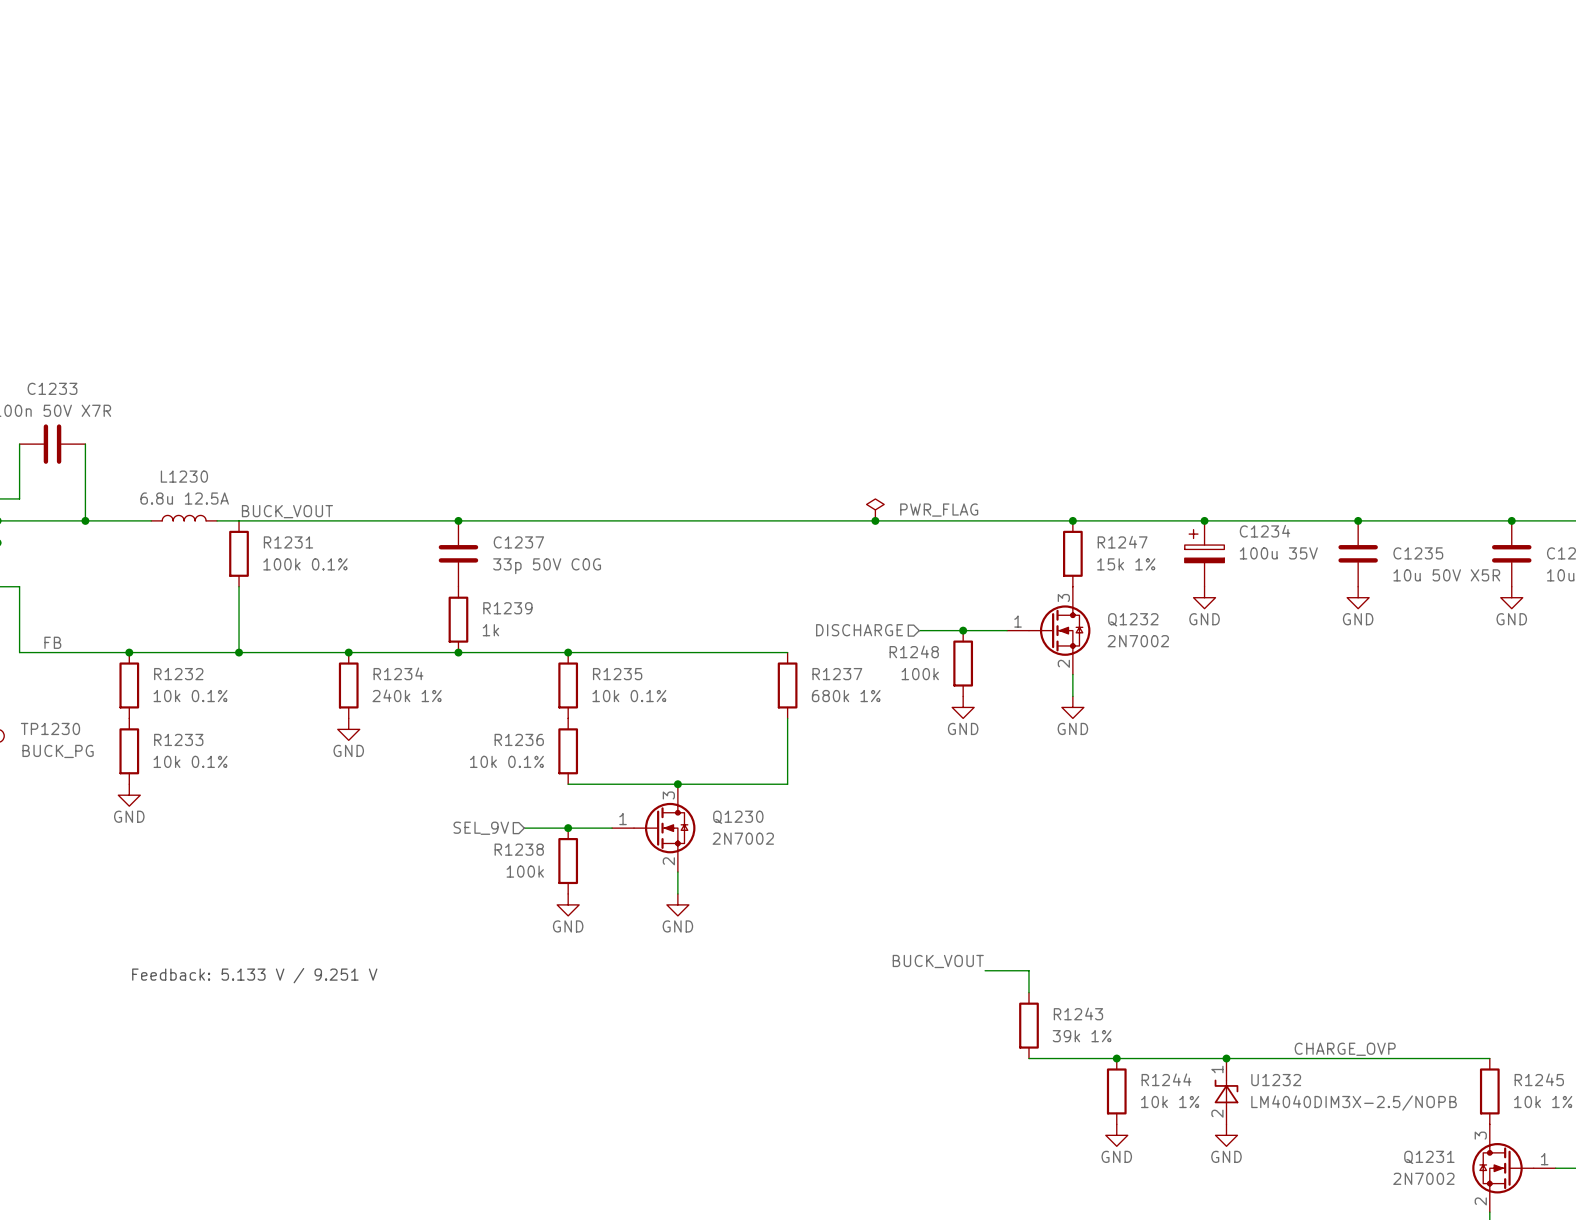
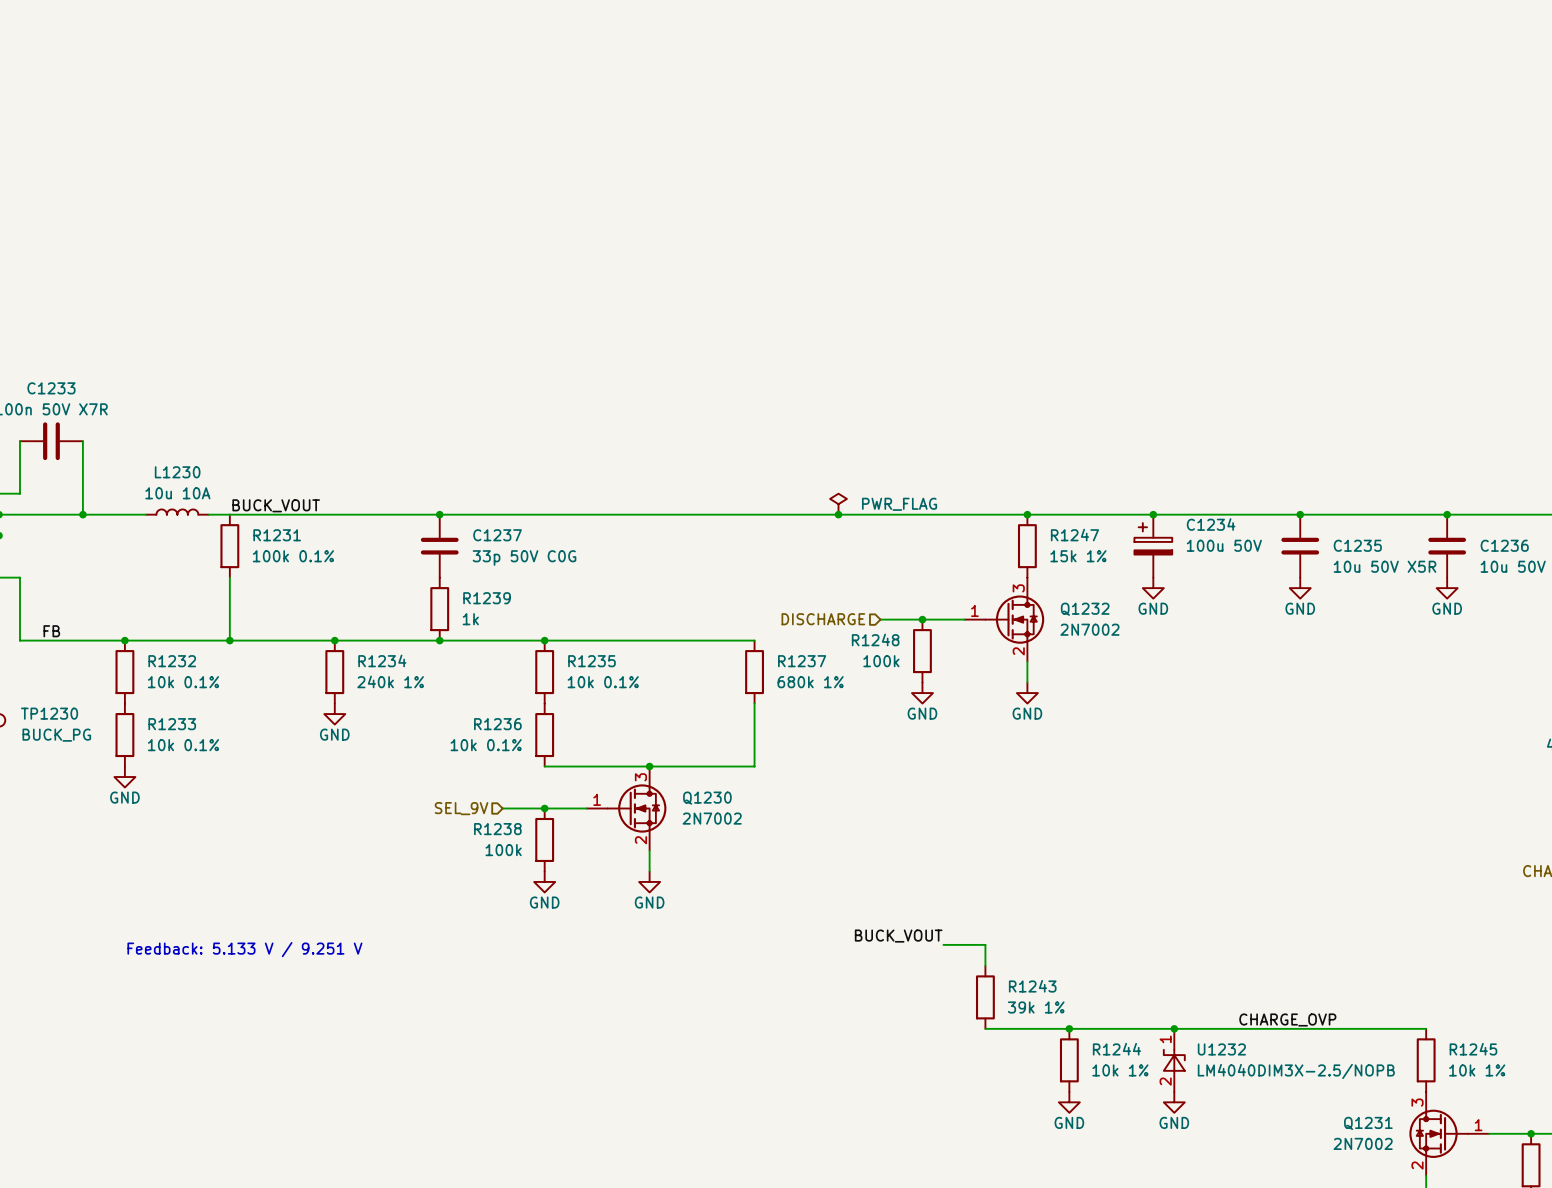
L1230 value: 6.8u 12.5A (184, 498) -> 10u 10A (177, 493)
C1234 value: 100u 35V (1278, 553) -> 100u 50V (1224, 545)

